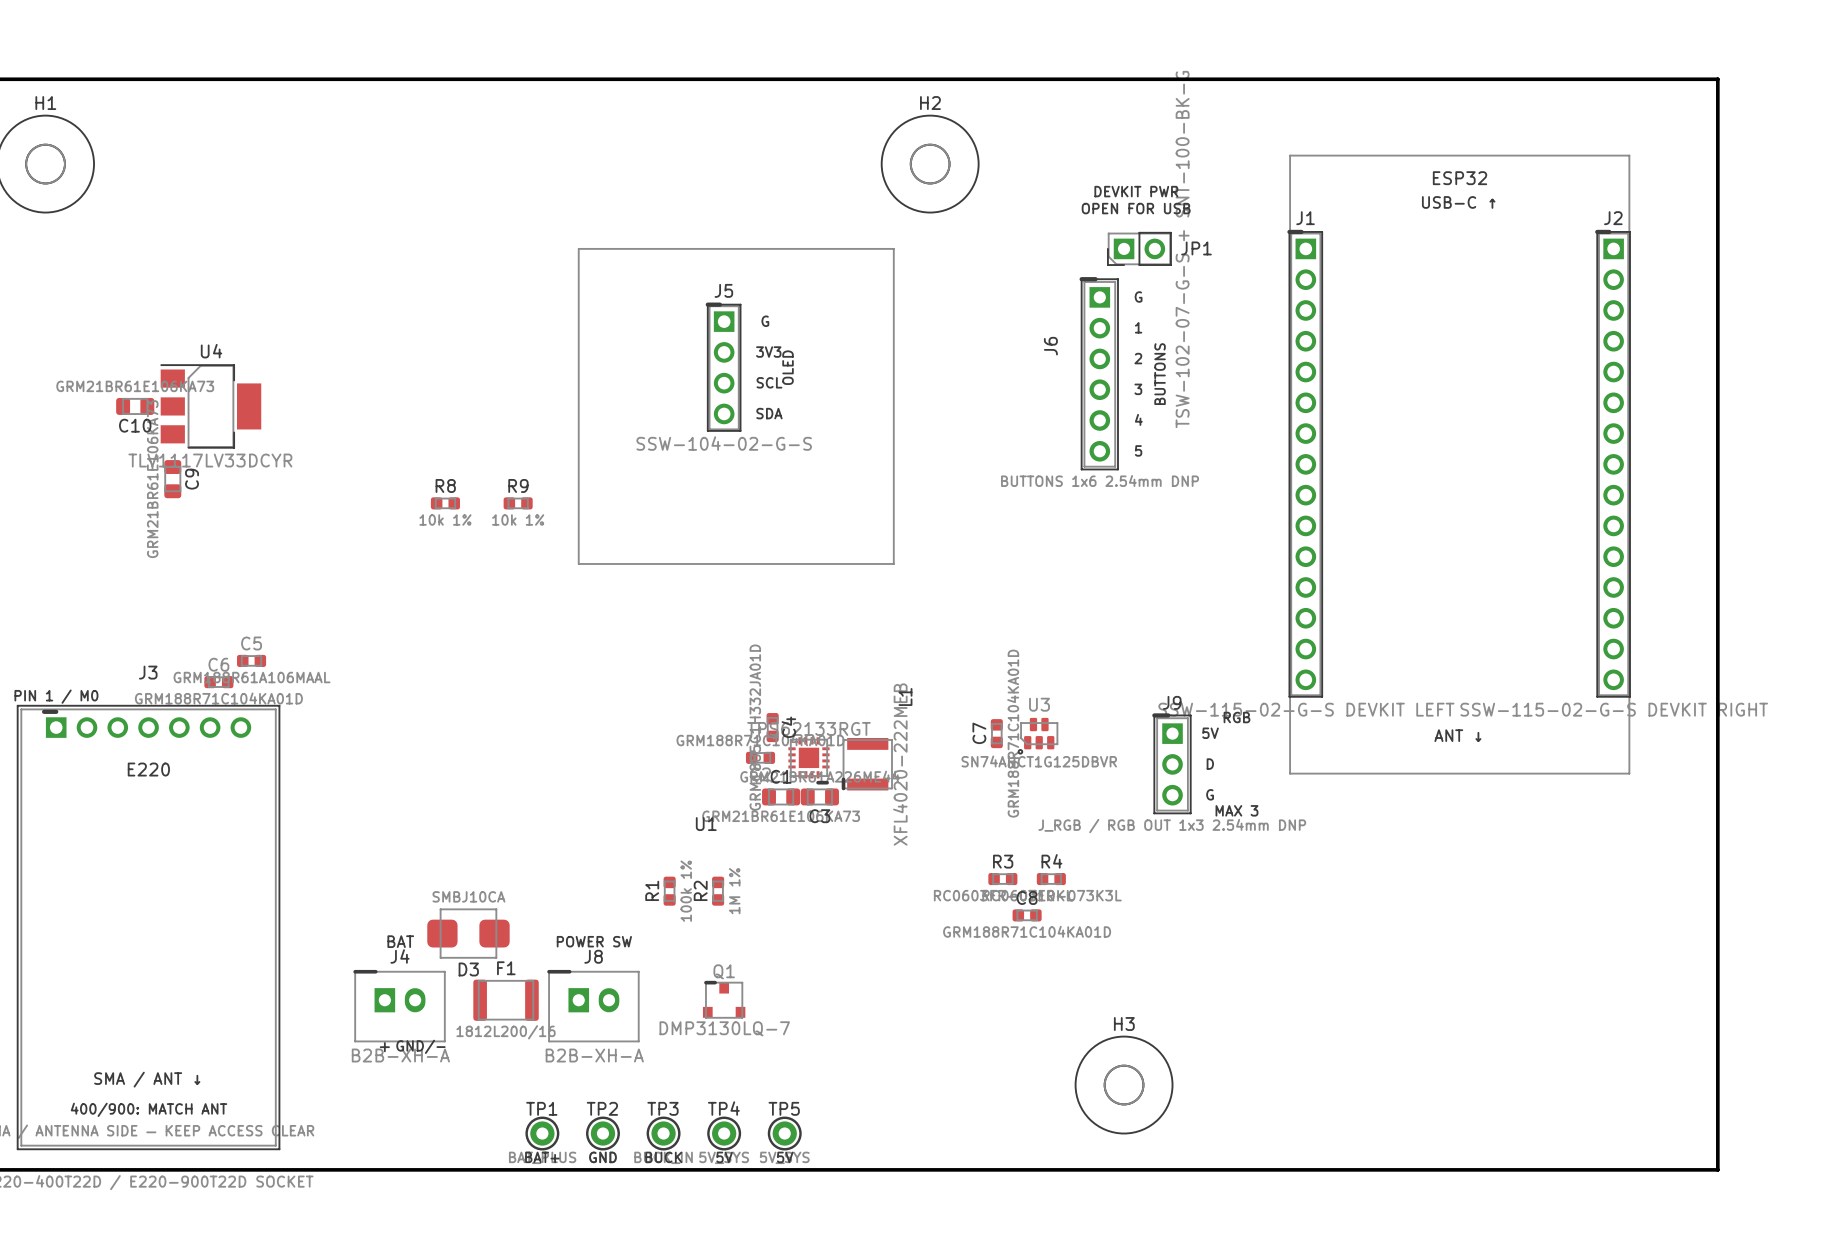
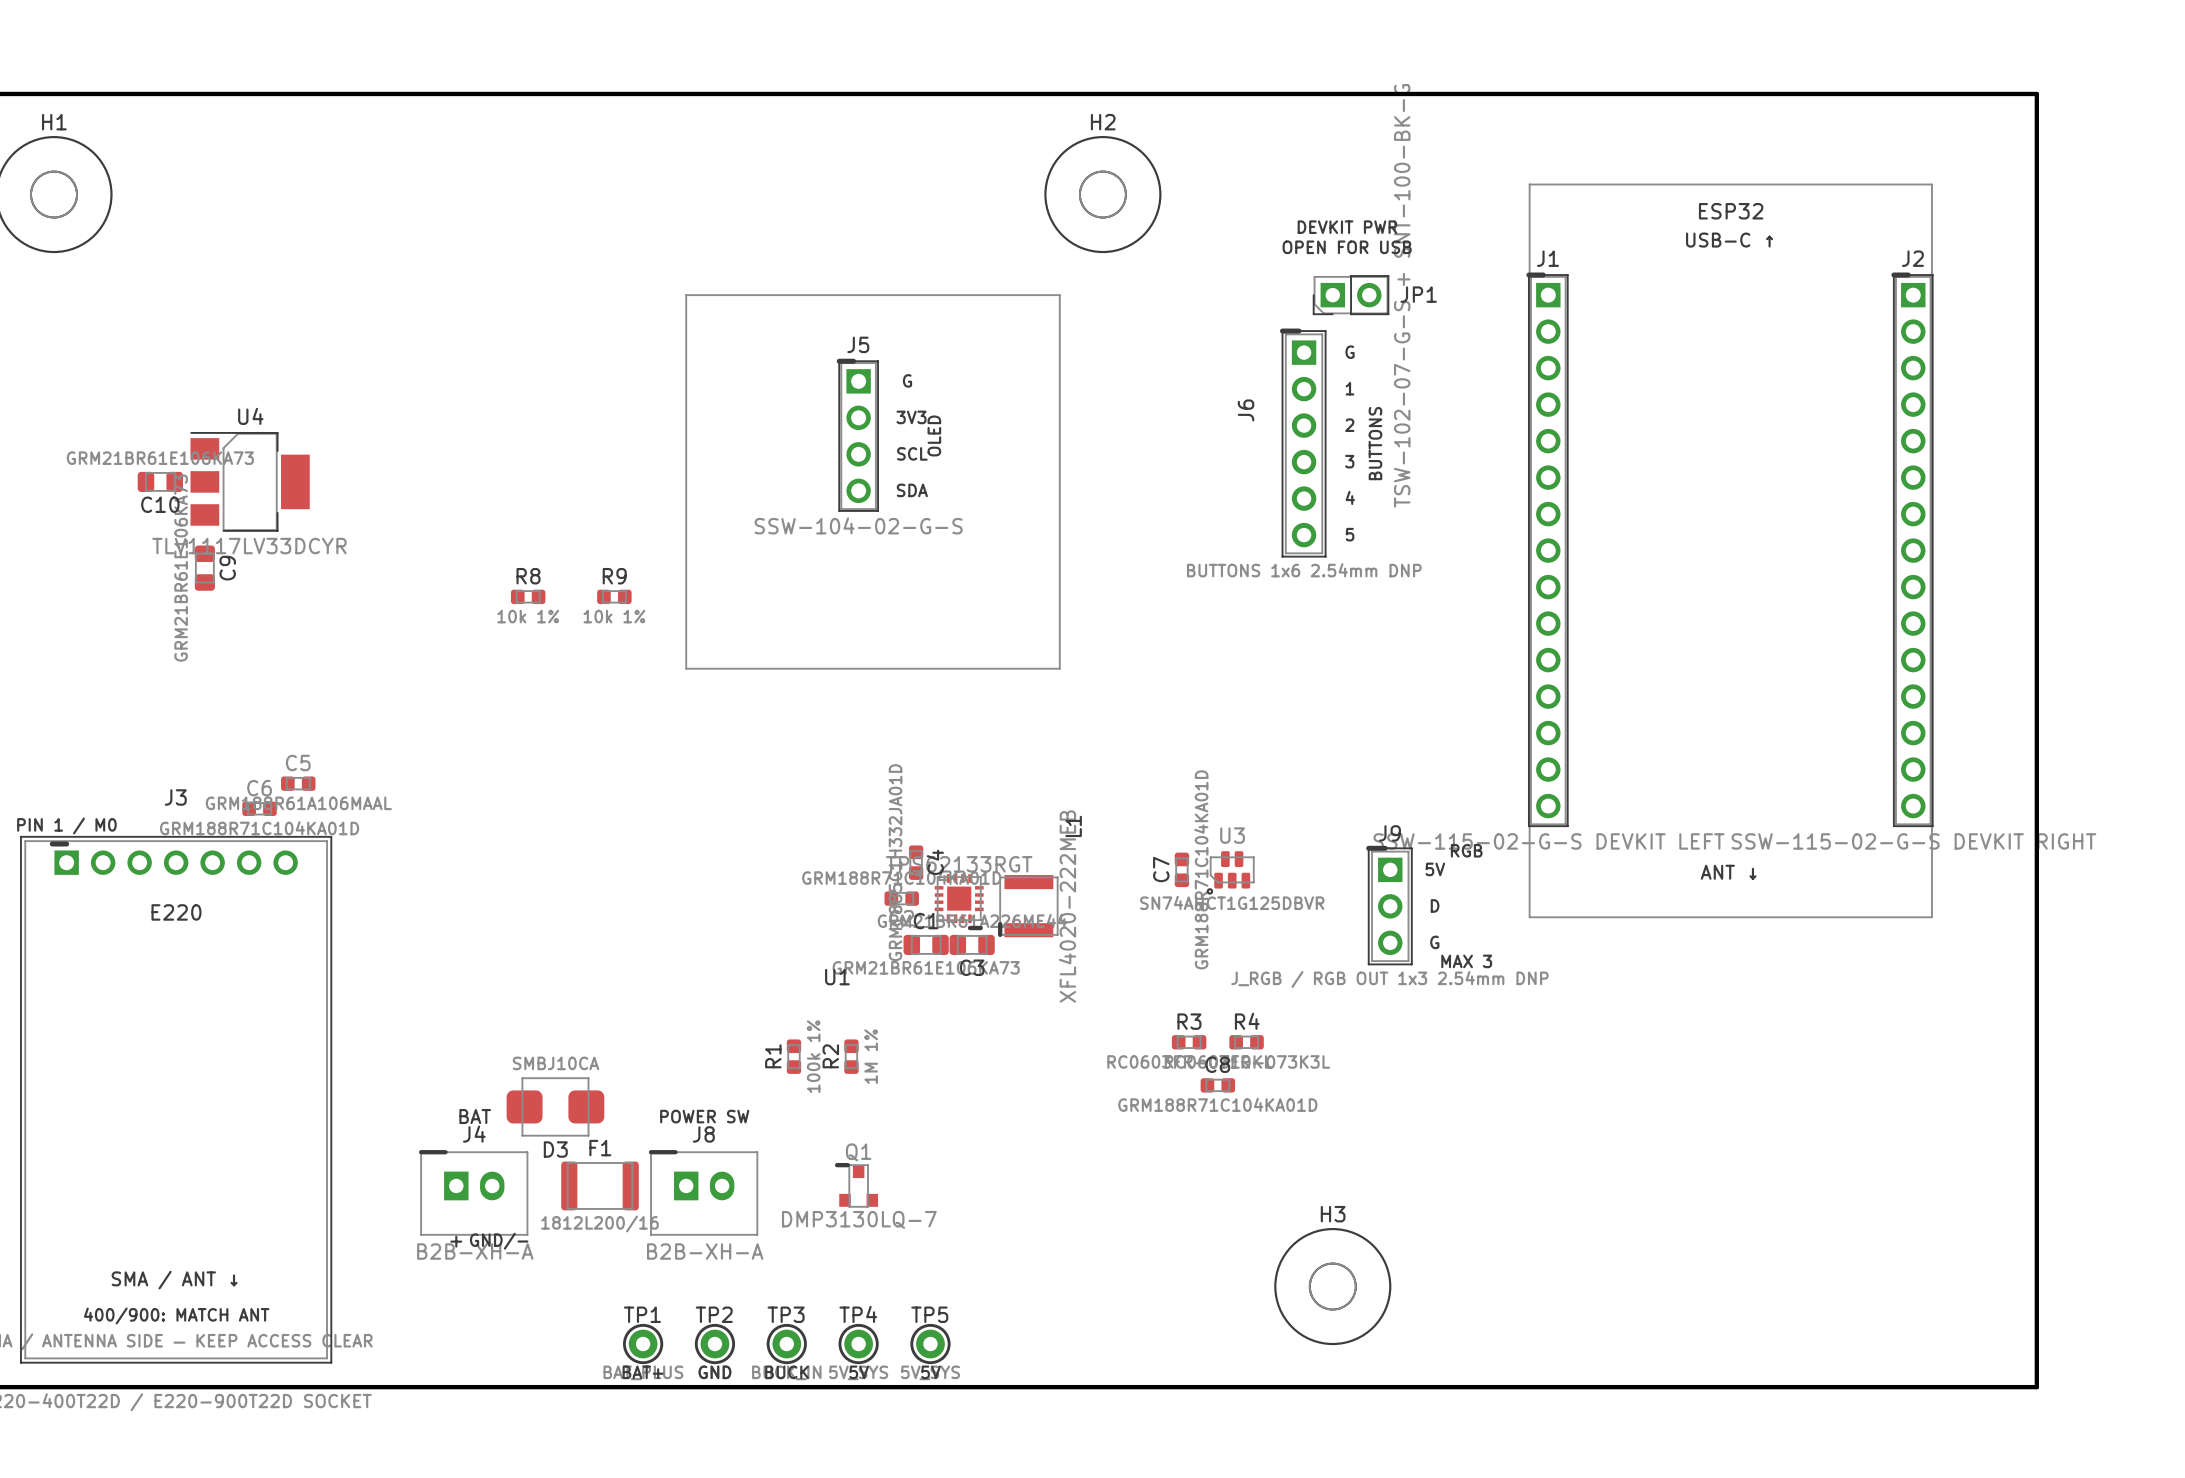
Q1 footprint: [702, 980, 746, 1019] -> [834, 1162, 879, 1208]

